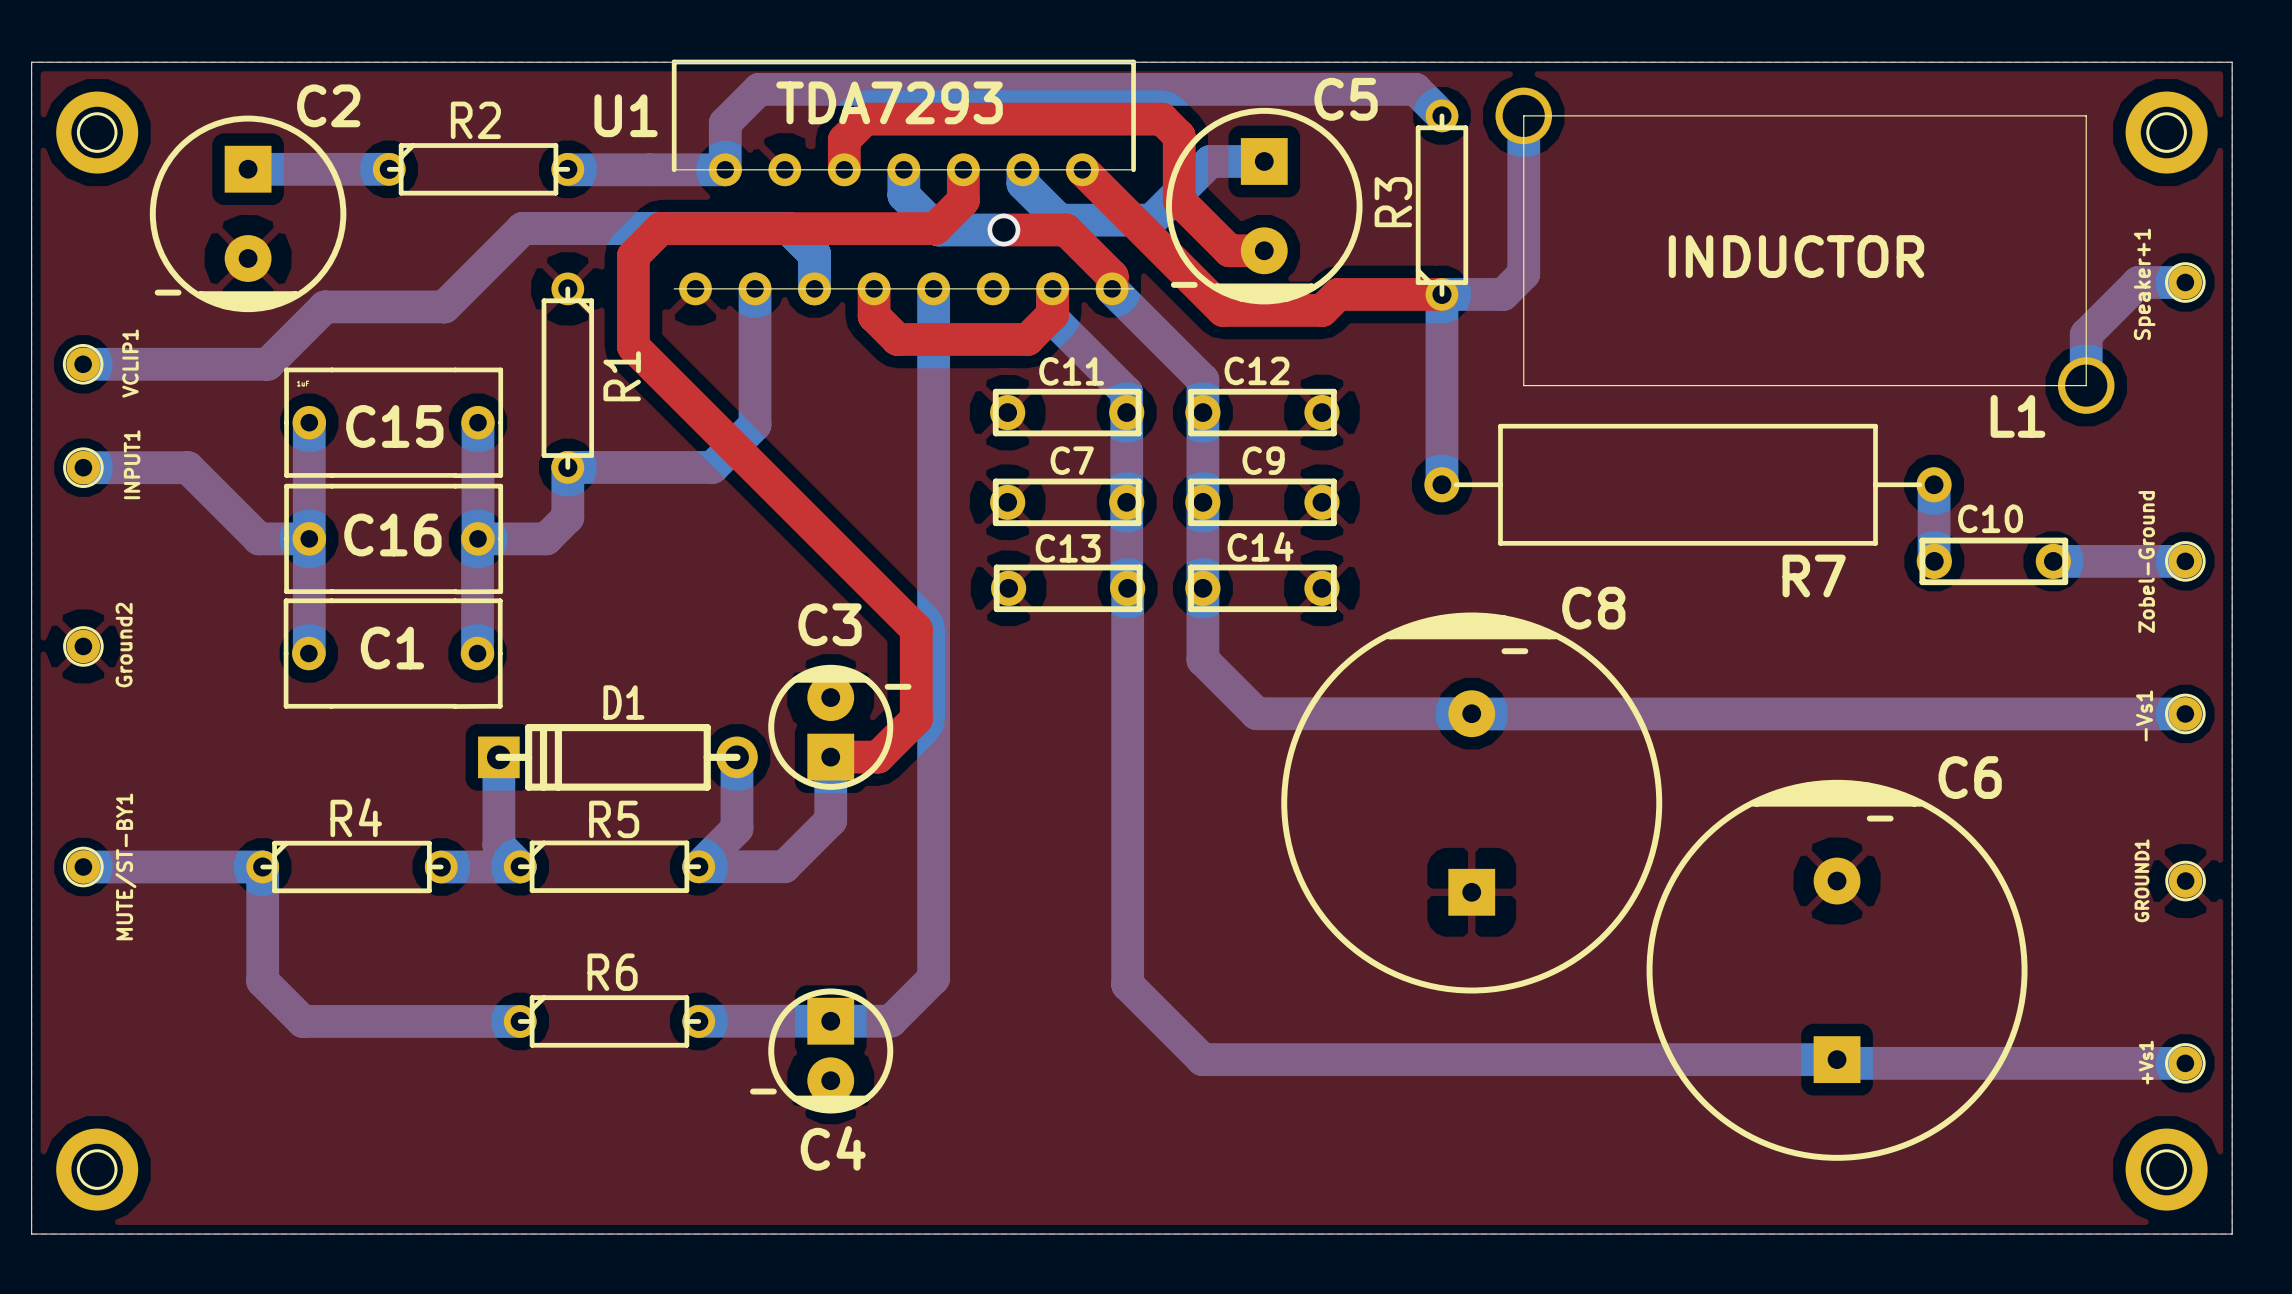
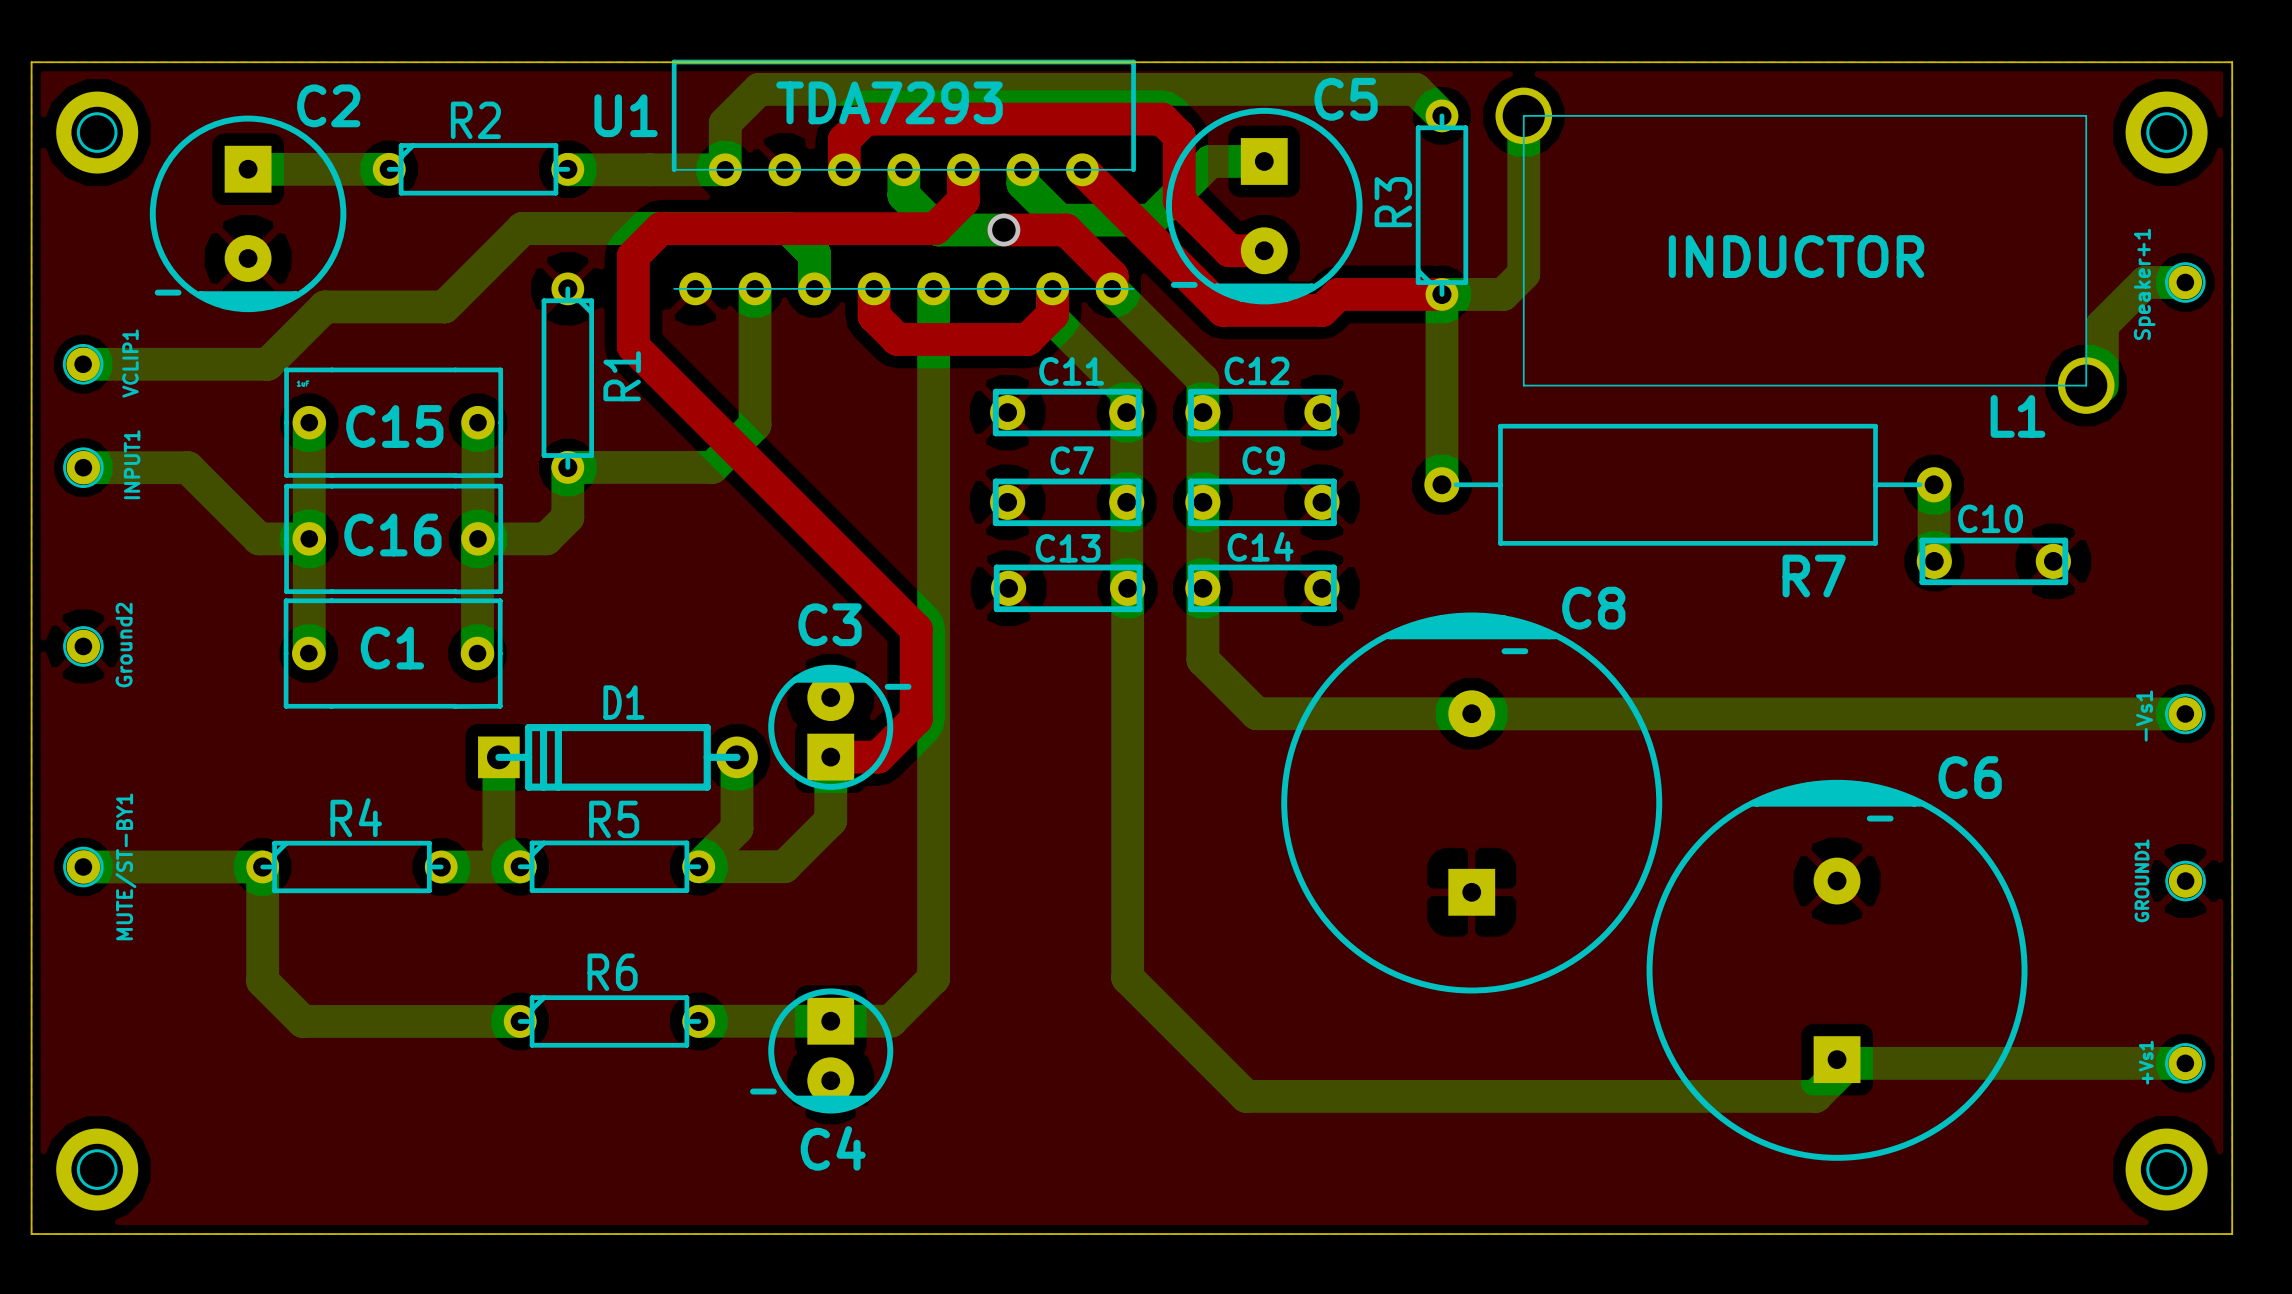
bottom track: (2145, 282) (2138, 282) (2086, 334) (2086, 385) -> (2145, 282) (2102, 325) (2102, 385)
bottom track: (2053, 561) (2185, 561) -> none
part: Zobel-Ground (2185, 561) -> none
bottom track: (1127, 977) (1127, 984) (1202, 1059) (1837, 1059) (1840, 1063) (1848, 1063) -> (1127, 977) (1246, 1096) (1815, 1096) (1848, 1063)

